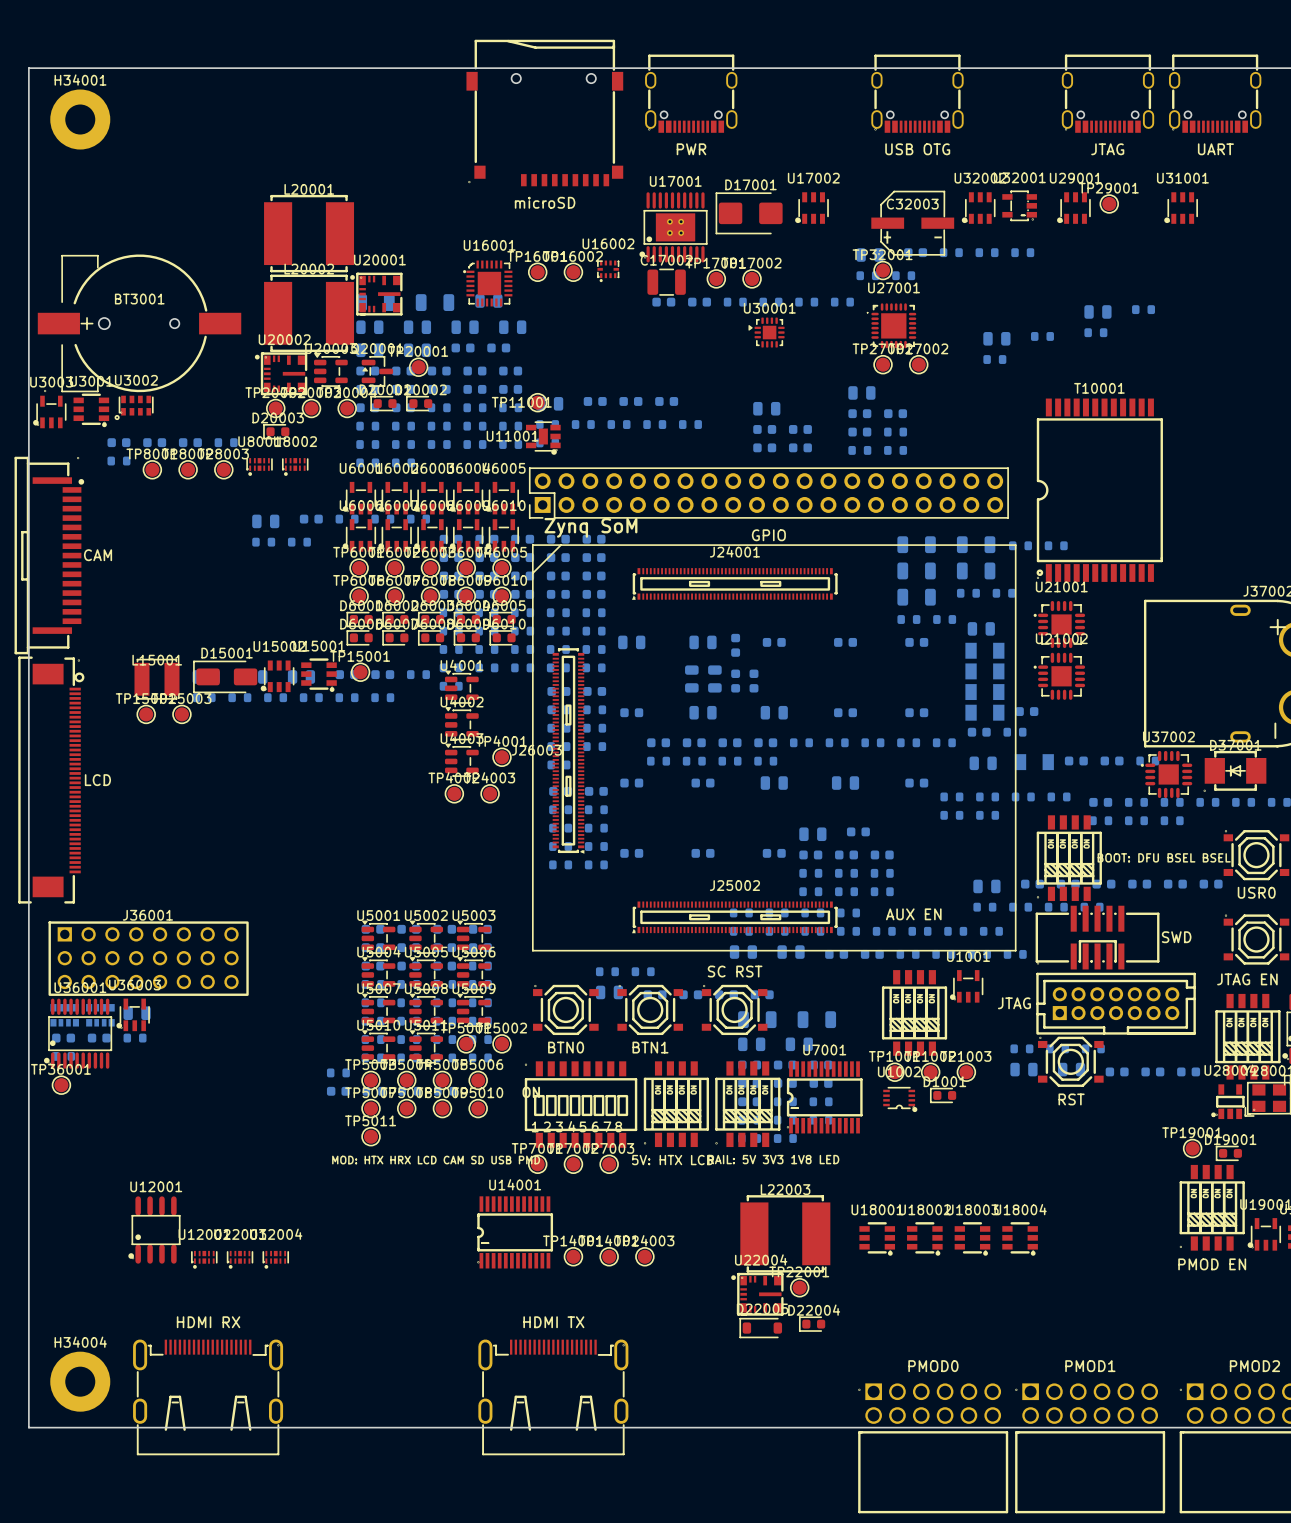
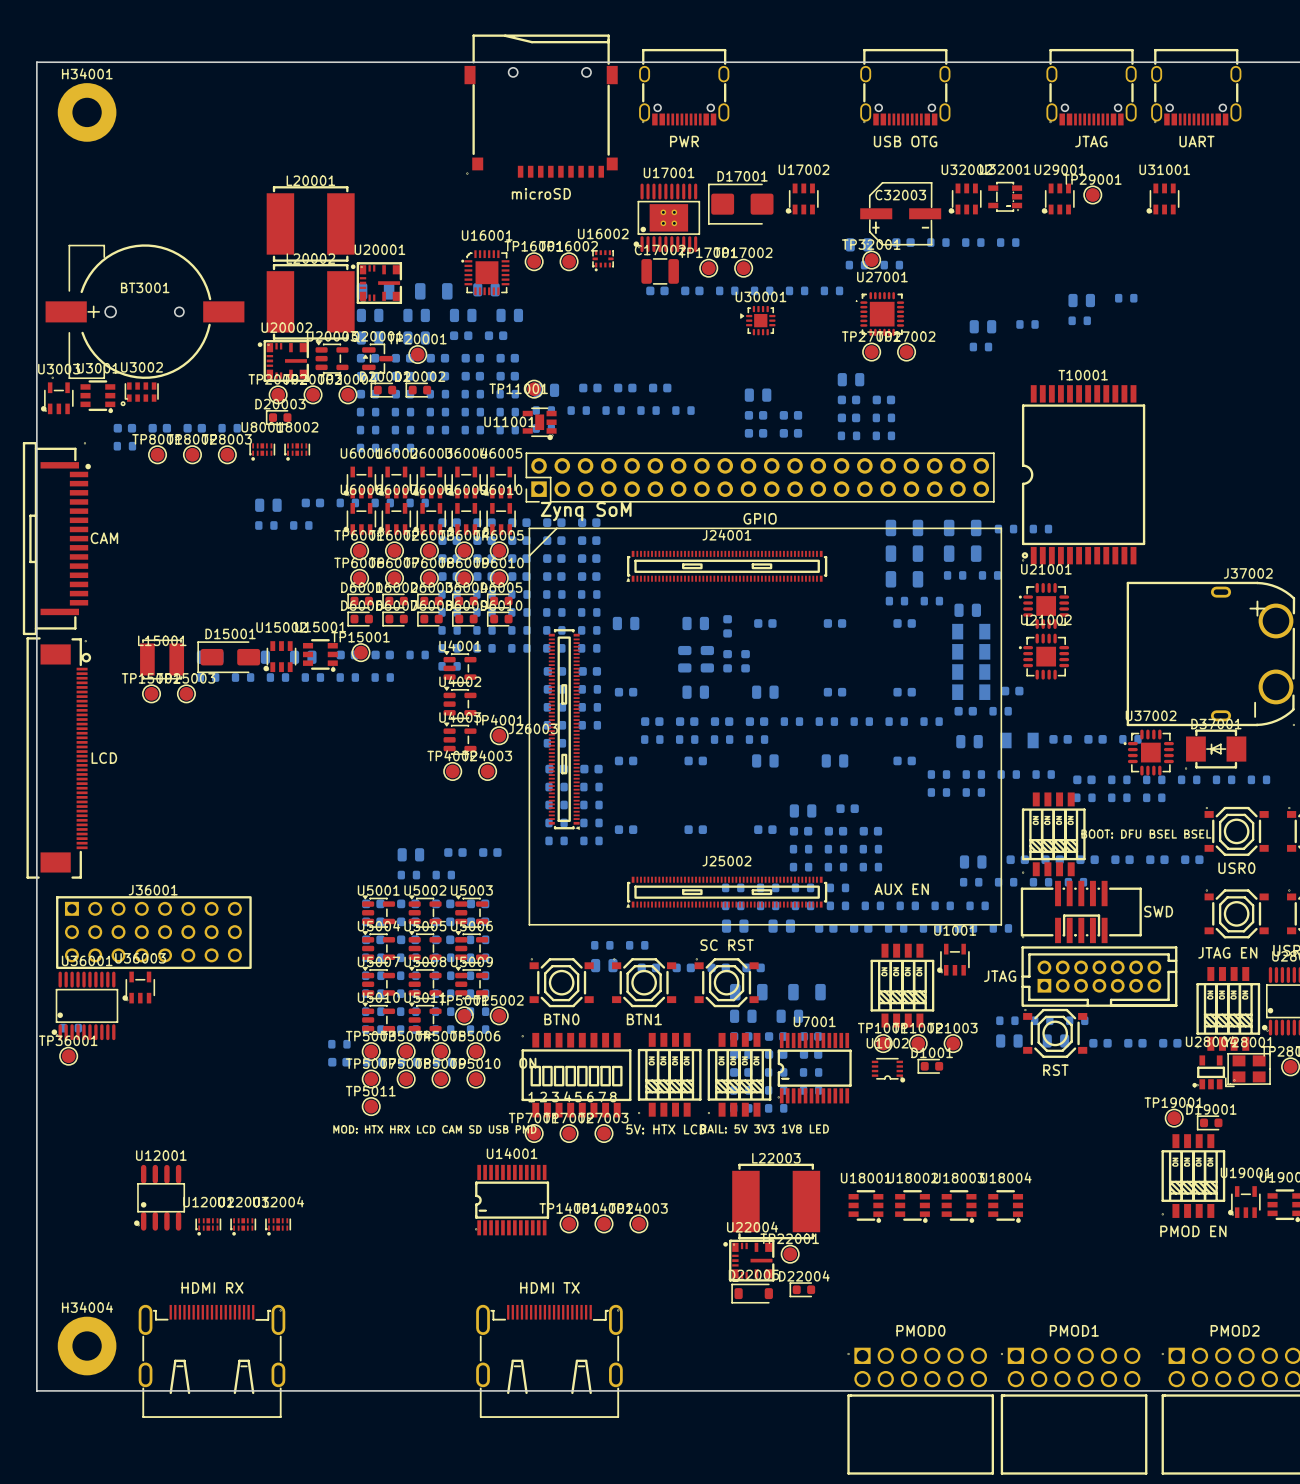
part: none -> (455, 852)
part: none -> (490, 852)
part: none -> (410, 854)
part: none -> (408, 875)
part: none -> (443, 875)
part: (137, 1013) -> none
part: (64, 1015) -> none
part: (100, 1015) -> none
part: (63, 1038) -> none
part: (99, 1038) -> none
part: (135, 1038) -> none

